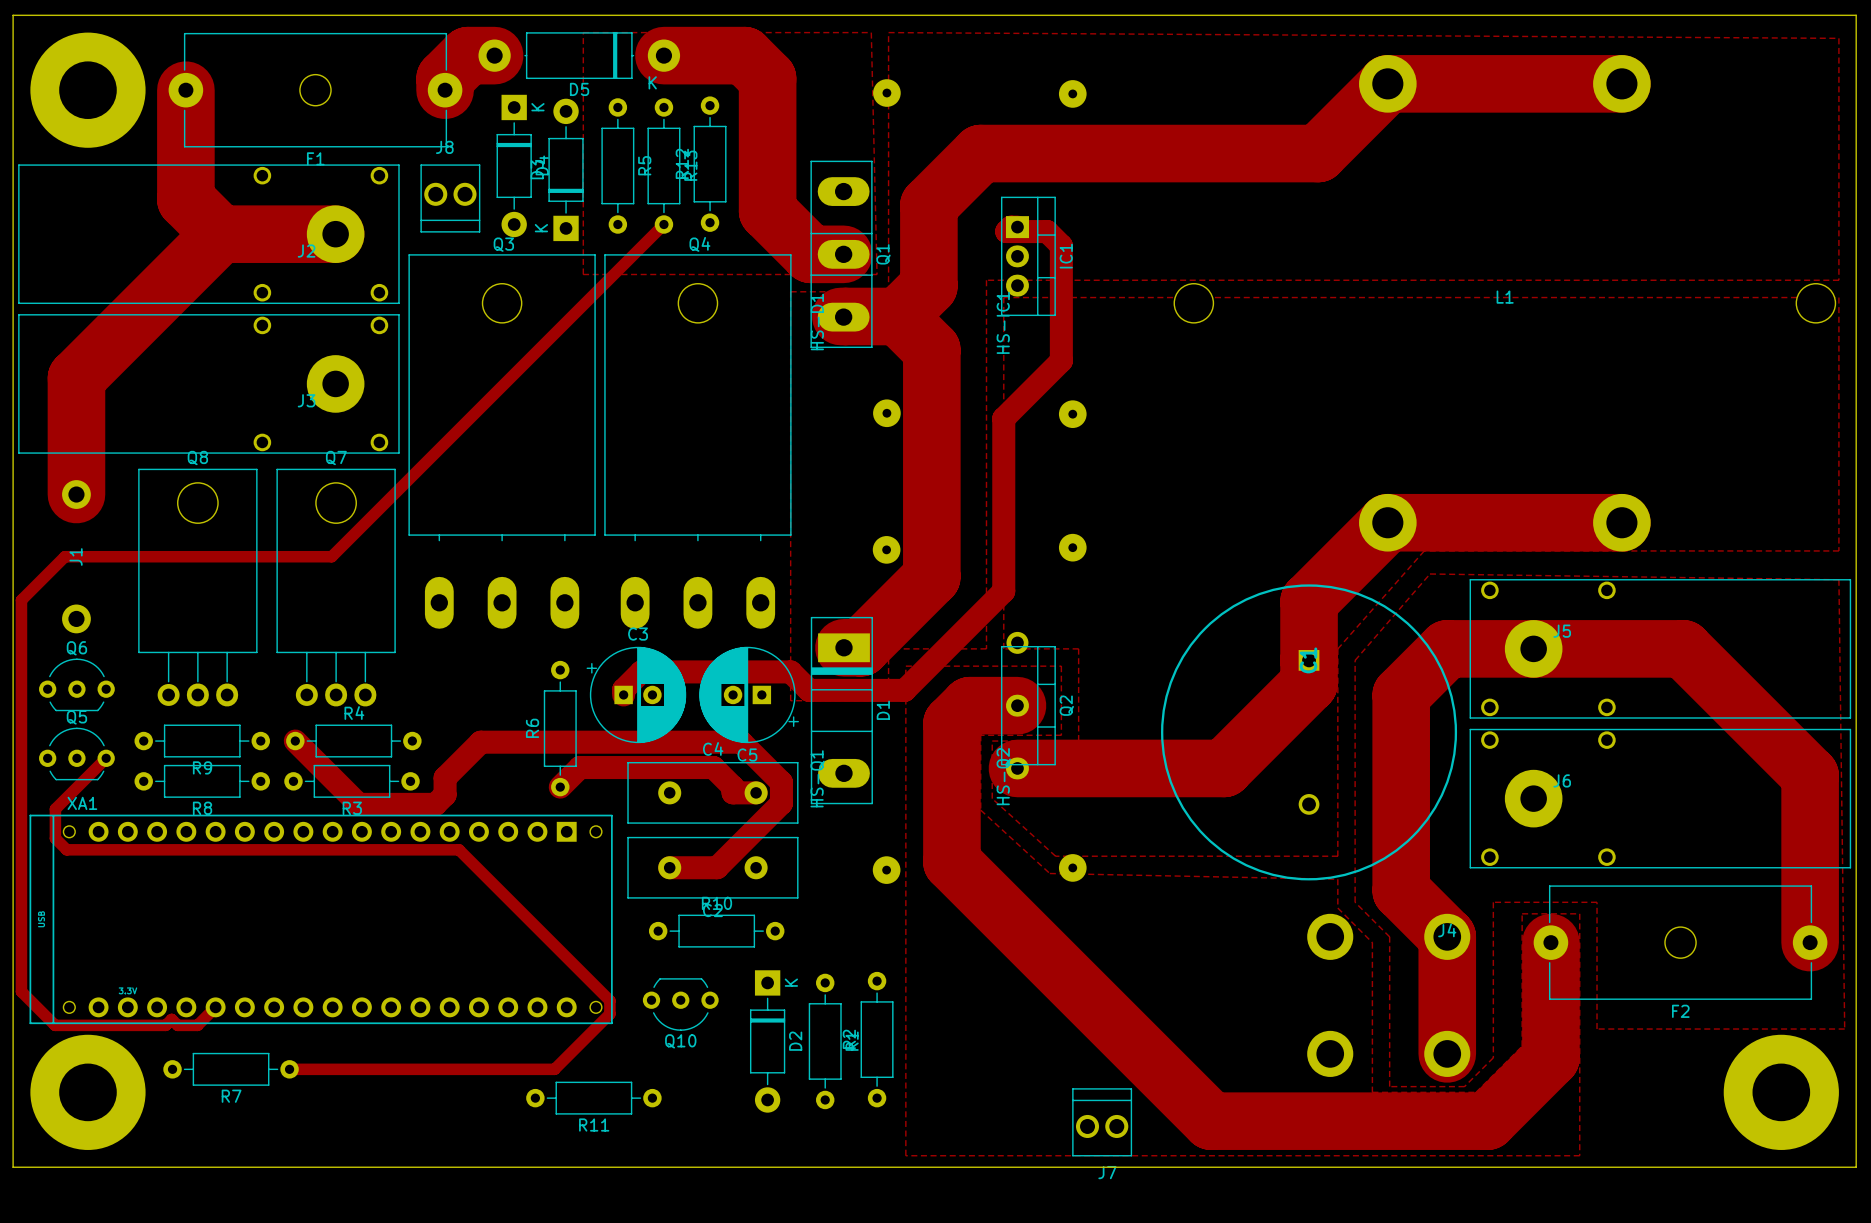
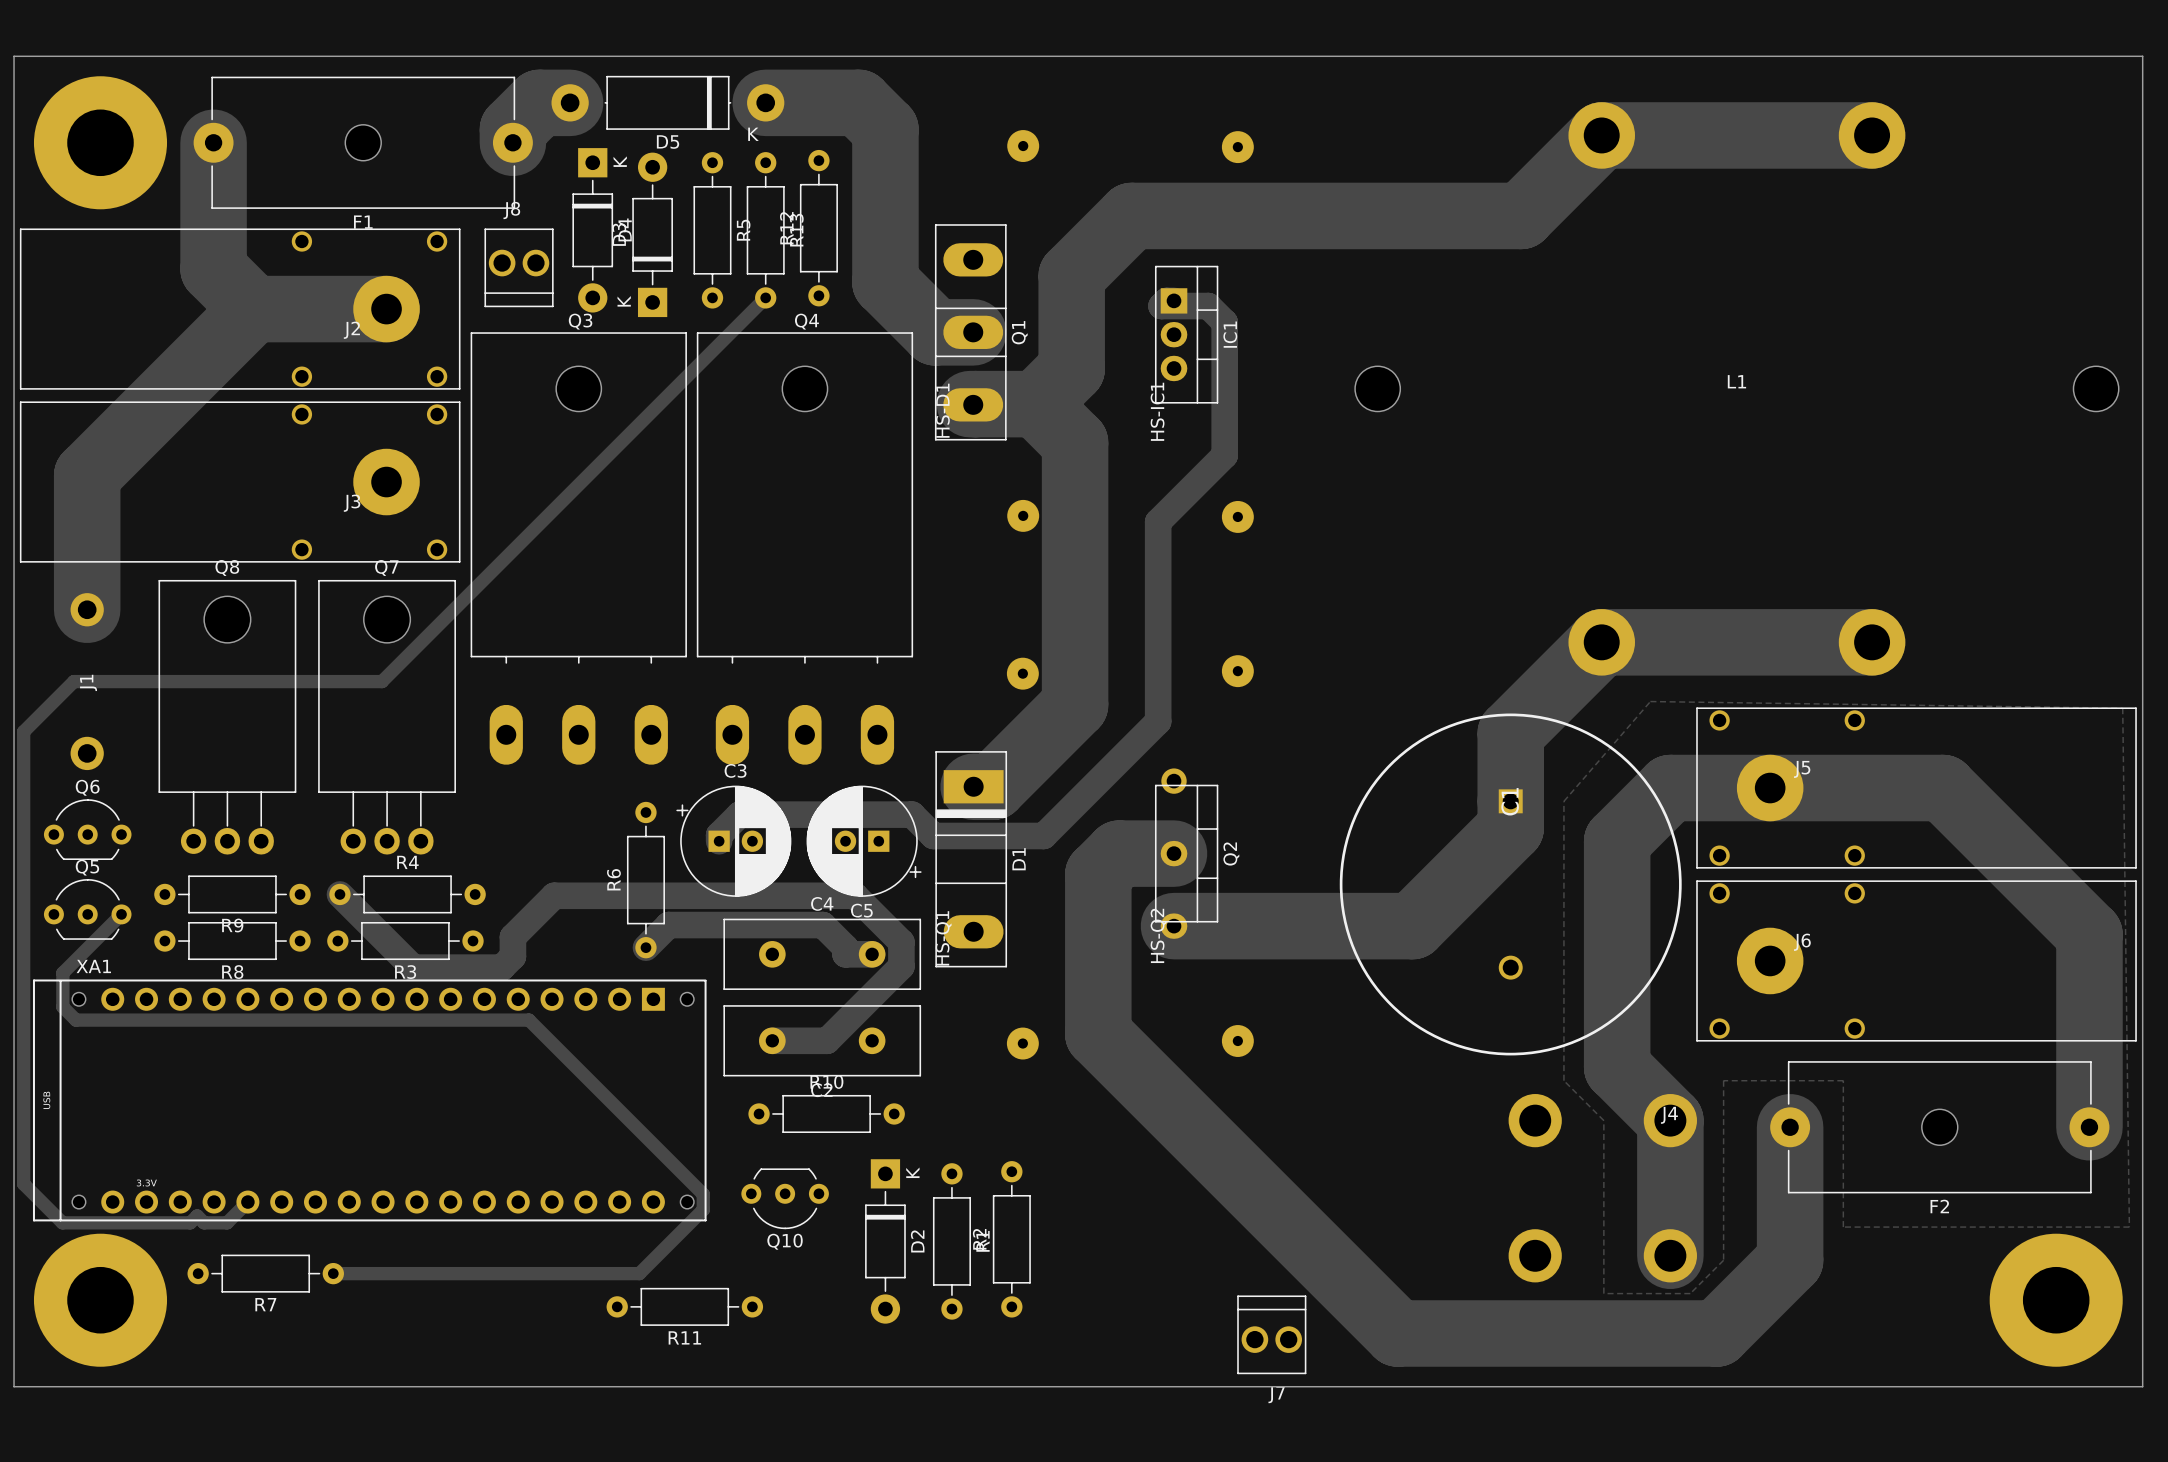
zone outline: (583, 32) (583, 274) (877, 274) (871, 32) (583, 32) -> none
zone outline: (888, 32) (888, 291) (790, 291) (790, 700) (888, 700) (888, 648) (986, 648) (986, 280) (1838, 280) (1838, 38) (888, 32) -> none
zone outline: (1003, 297) (1003, 648) (1078, 648) (1078, 741) (992, 741) (992, 798) (1055, 856) (1337, 856) (1337, 648) (1424, 550) (1838, 550) (1838, 297) (1003, 297) -> none
zone outline: (905, 666) (905, 1155) (1579, 1155) (1579, 913) (1522, 913) (1522, 1046) (1476, 1092) (1372, 1092) (1372, 942) (1337, 908) (1337, 879) (1049, 873) (980, 810) (980, 735) (1061, 735) (1061, 666) (905, 666) -> none

